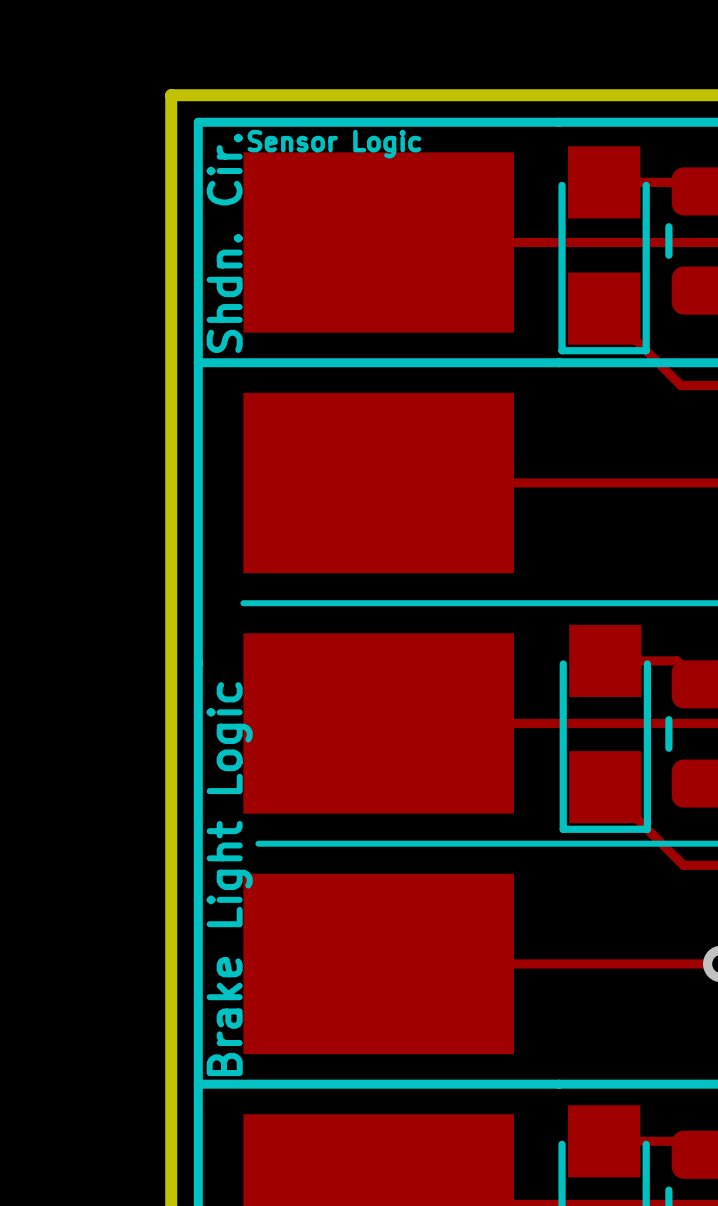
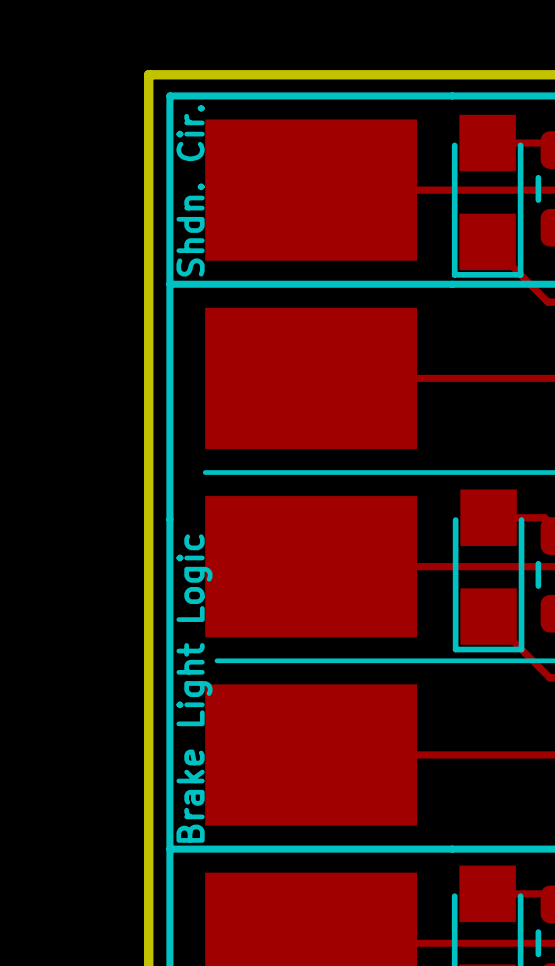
text: Sensor Logic (334, 144) -> none

